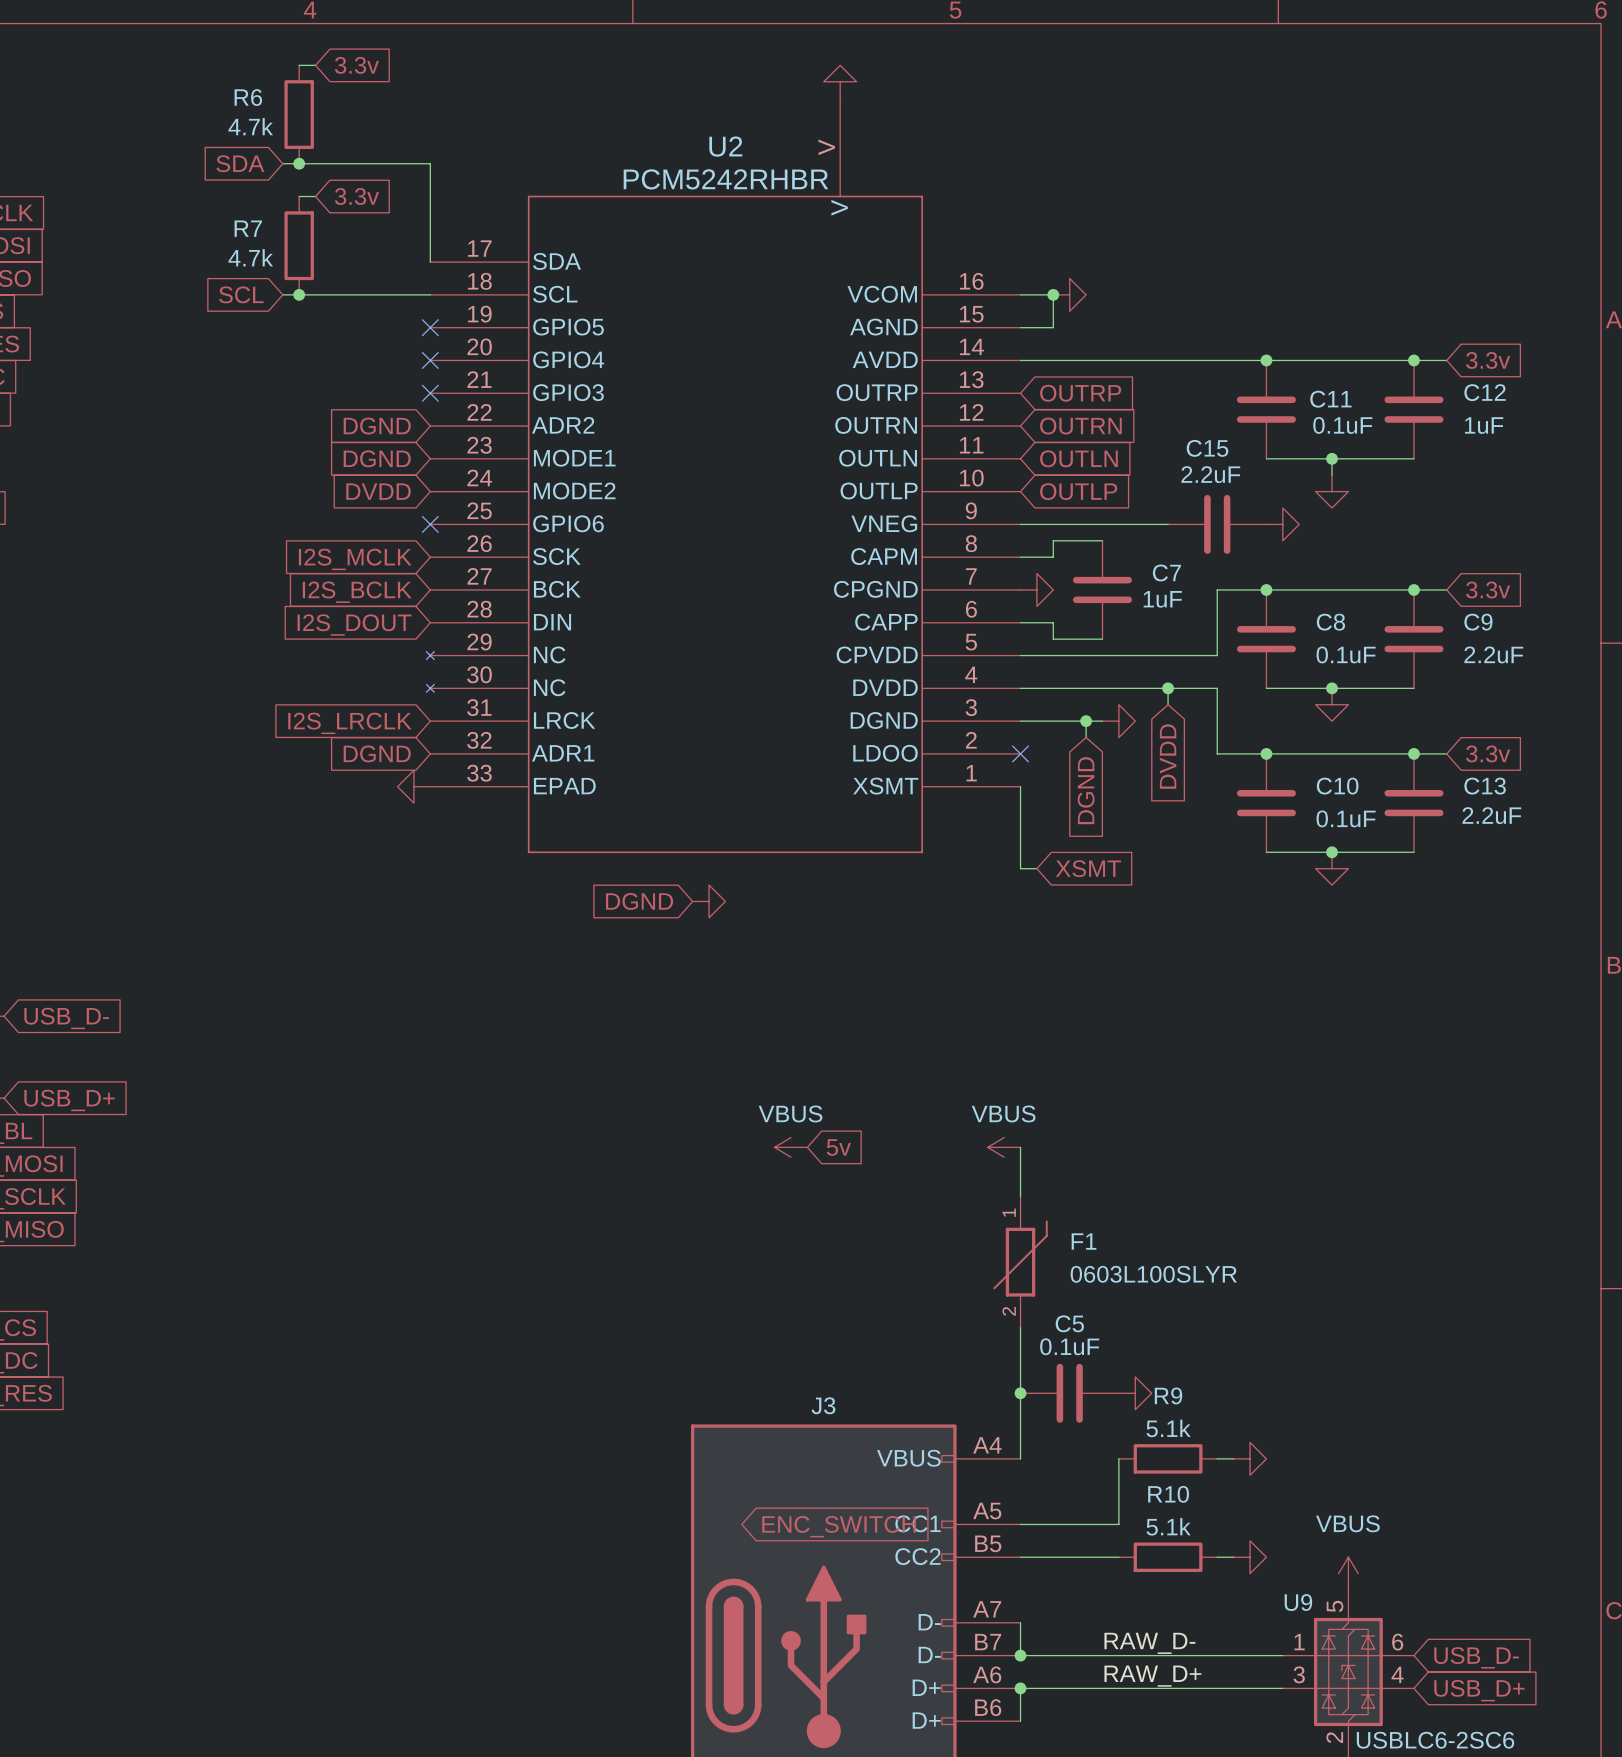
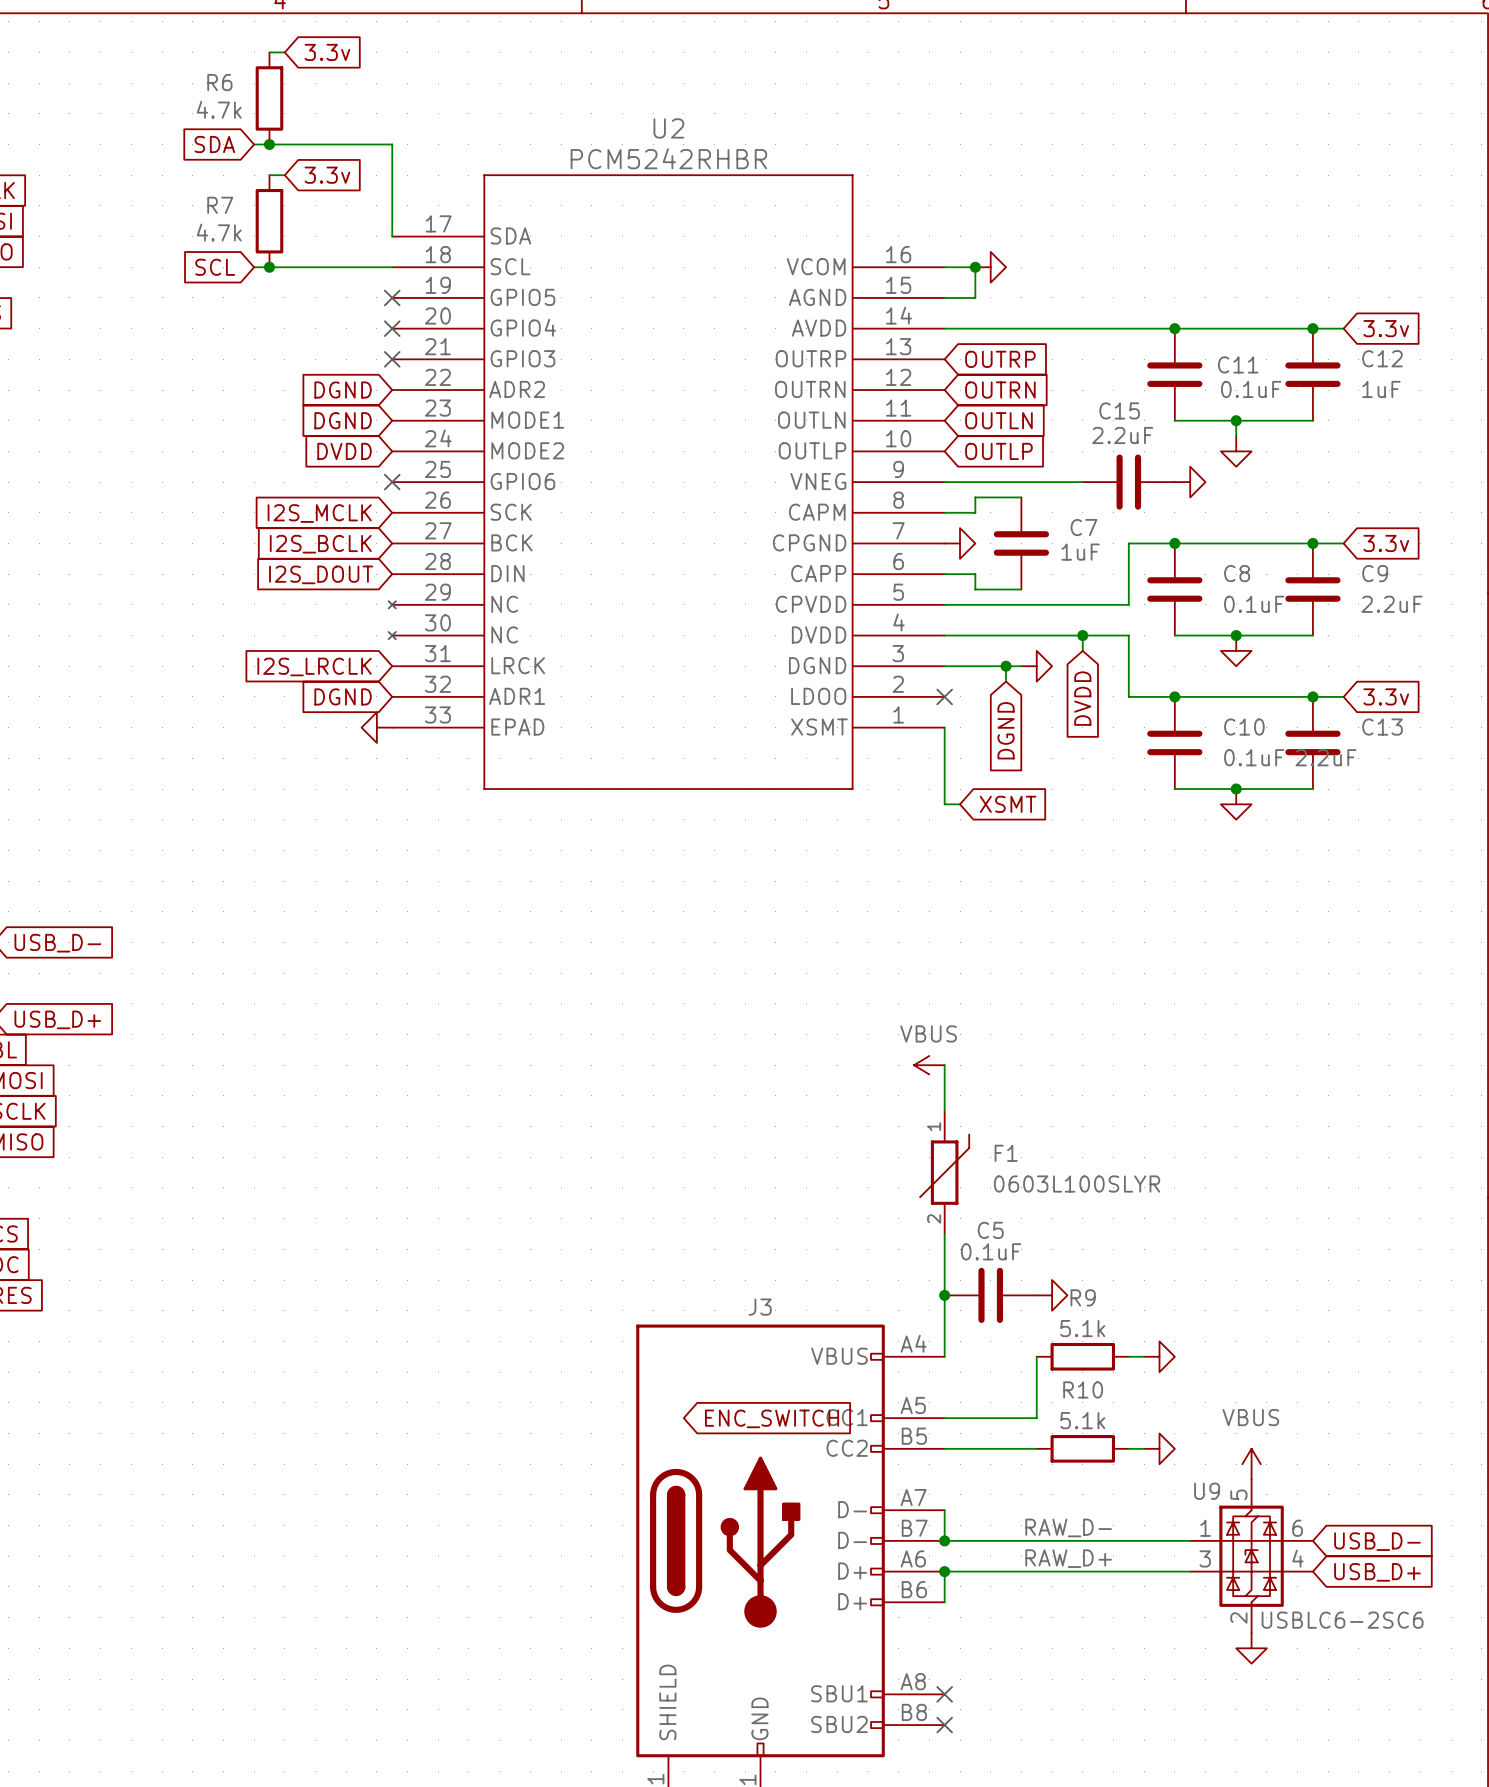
power symbol: (840, 81) -> none
U2 symbol: [426, 98, 1021, 854] -> [388, 174, 945, 790]
C13 value position: 2.2uF (1491, 815) -> 2.2uF (1325, 757)
global label: DGND (639, 901) -> none
power symbol: (709, 901) -> none
power symbol: VBUS (791, 1147) -> none
global label: 5v (838, 1147) -> none

